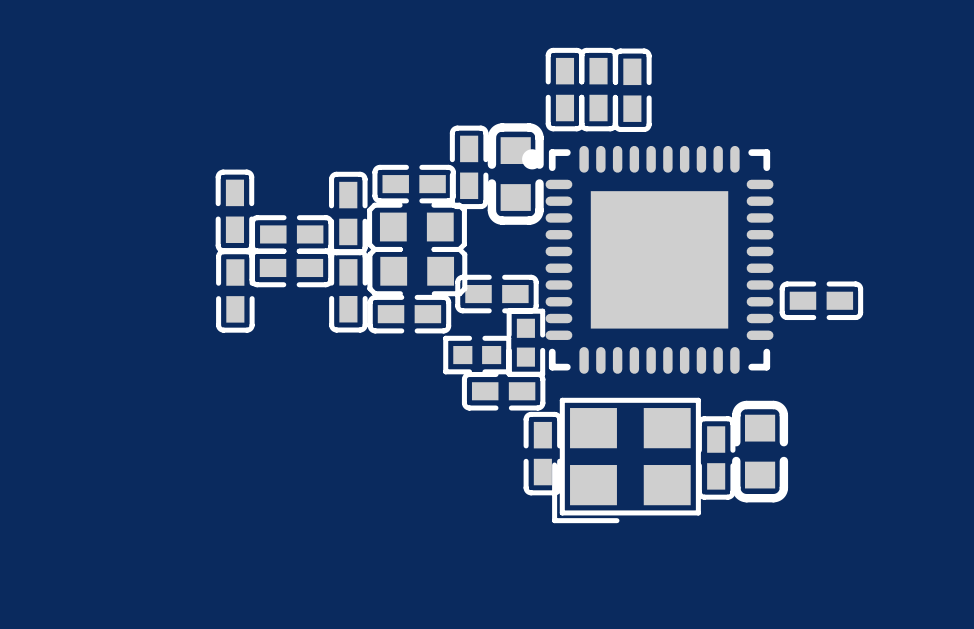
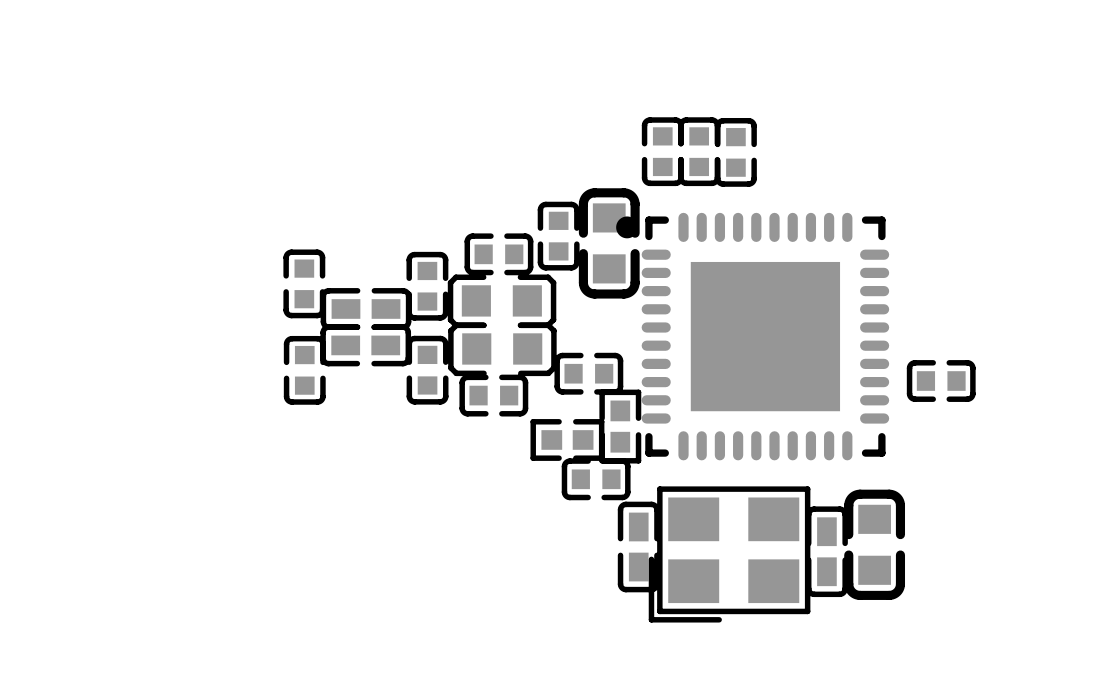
part footprint: [545, 47, 585, 132] -> [641, 117, 684, 187]
part footprint: [579, 47, 618, 132] -> [678, 117, 721, 187]
part footprint: [613, 48, 652, 132] -> [714, 118, 757, 187]
part footprint: [449, 125, 489, 210] -> [537, 201, 580, 271]
part footprint: [372, 164, 456, 204] -> [464, 233, 534, 276]
part footprint: [215, 169, 255, 254] -> [283, 249, 326, 319]
part footprint: [329, 171, 368, 256] -> [406, 251, 449, 321]
part footprint: [216, 249, 255, 333] -> [283, 335, 326, 405]
part footprint: [329, 249, 368, 333] -> [406, 335, 449, 405]
part footprint: [455, 274, 539, 314] -> [554, 352, 624, 395]
part footprint: [779, 281, 864, 321] -> [906, 360, 976, 402]
part footprint: [367, 294, 452, 334] -> [459, 374, 529, 417]
part footprint: [461, 371, 546, 411] -> [561, 458, 631, 501]

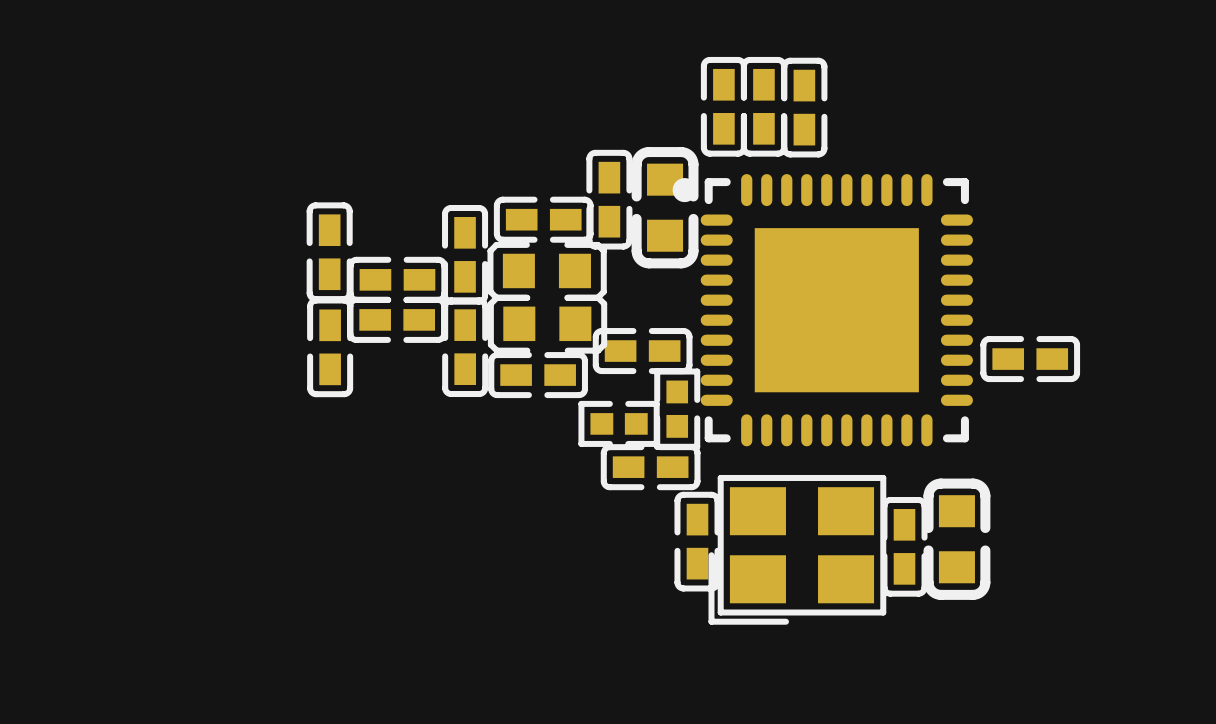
part footprint: [641, 117, 684, 187] -> [700, 56, 747, 157]
part footprint: [678, 117, 721, 187] -> [740, 56, 787, 157]
part footprint: [714, 118, 757, 187] -> [781, 57, 828, 158]
part footprint: [537, 201, 580, 271] -> [586, 149, 633, 250]
part footprint: [464, 233, 534, 276] -> [493, 196, 594, 243]
part footprint: [283, 249, 326, 319] -> [306, 202, 353, 303]
part footprint: [406, 251, 449, 321] -> [442, 204, 489, 305]
part footprint: [283, 335, 326, 405] -> [307, 297, 354, 398]
part footprint: [406, 335, 449, 405] -> [442, 297, 489, 398]
part footprint: [554, 352, 624, 395] -> [592, 328, 693, 375]
part footprint: [906, 360, 976, 402] -> [980, 336, 1081, 383]
part footprint: [459, 374, 529, 417] -> [488, 352, 588, 399]
part footprint: [561, 458, 631, 501] -> [600, 444, 701, 491]

